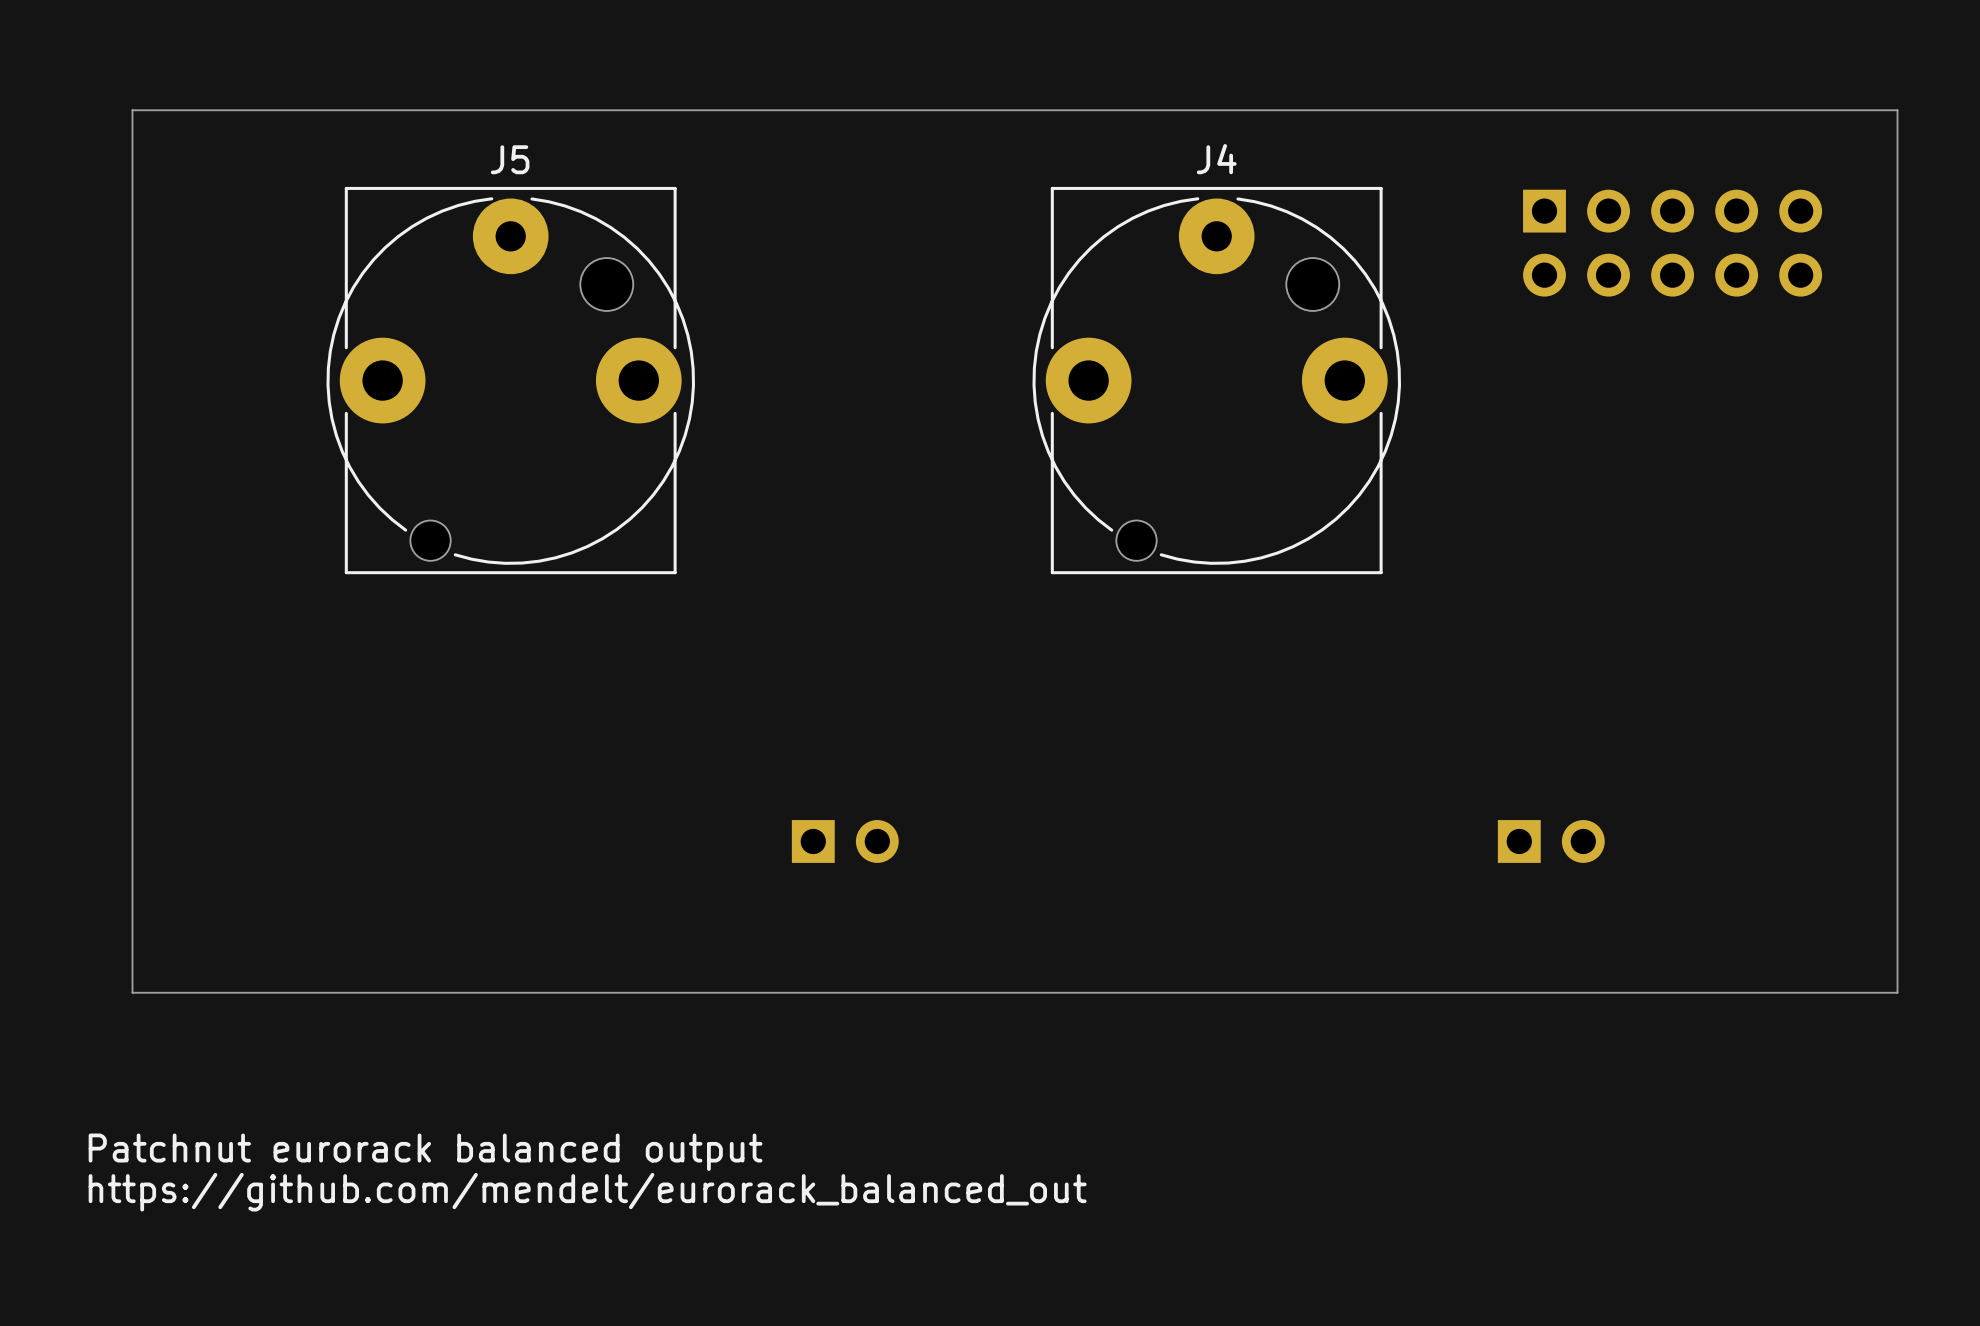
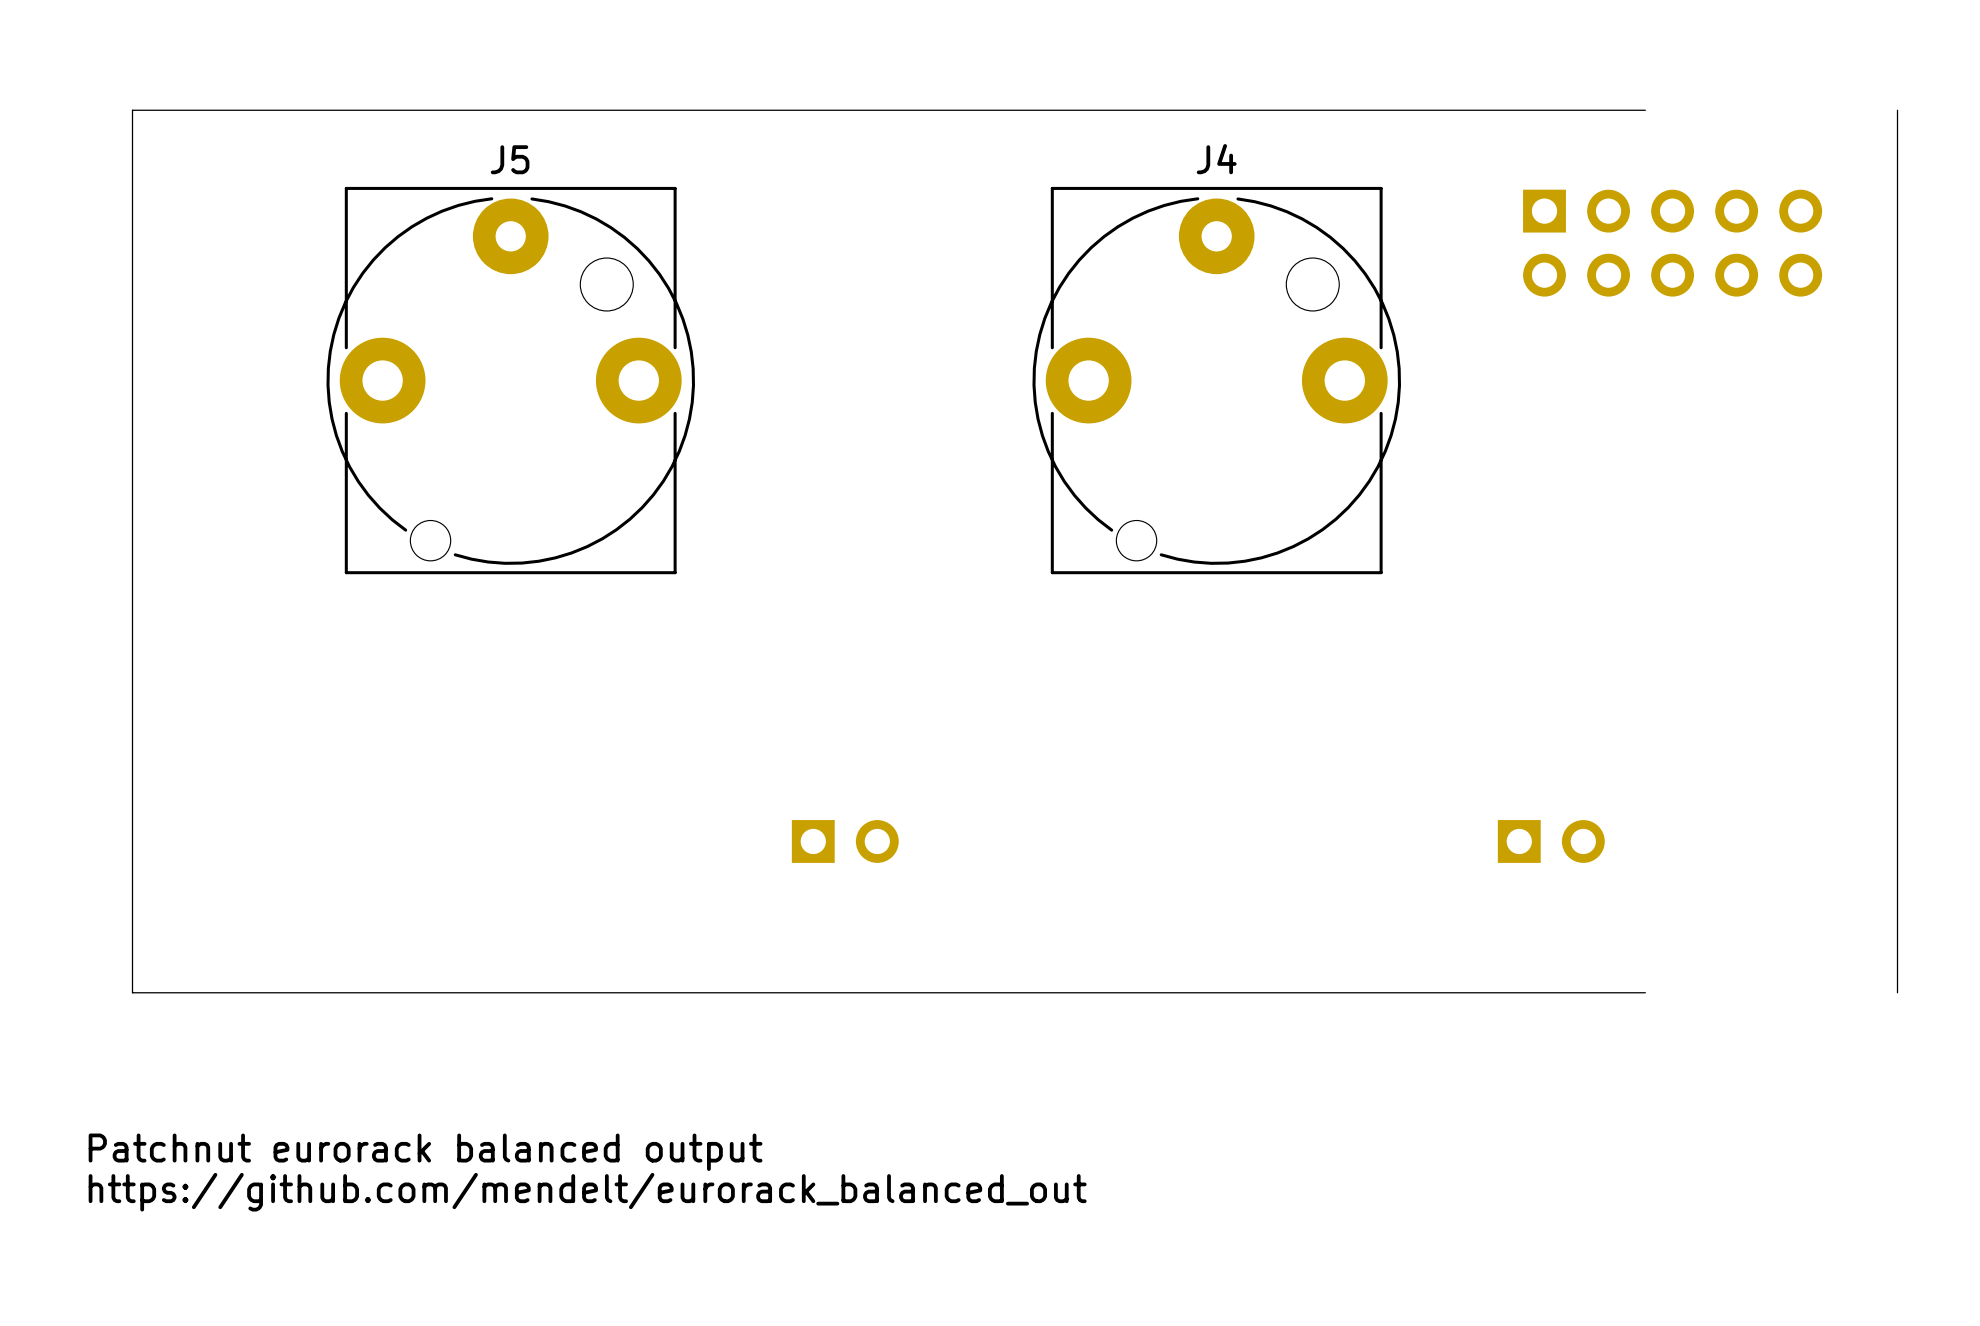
board edge: (1897, 110) (1645, 110) -> none
board edge: (1897, 992) (1645, 992) -> none

